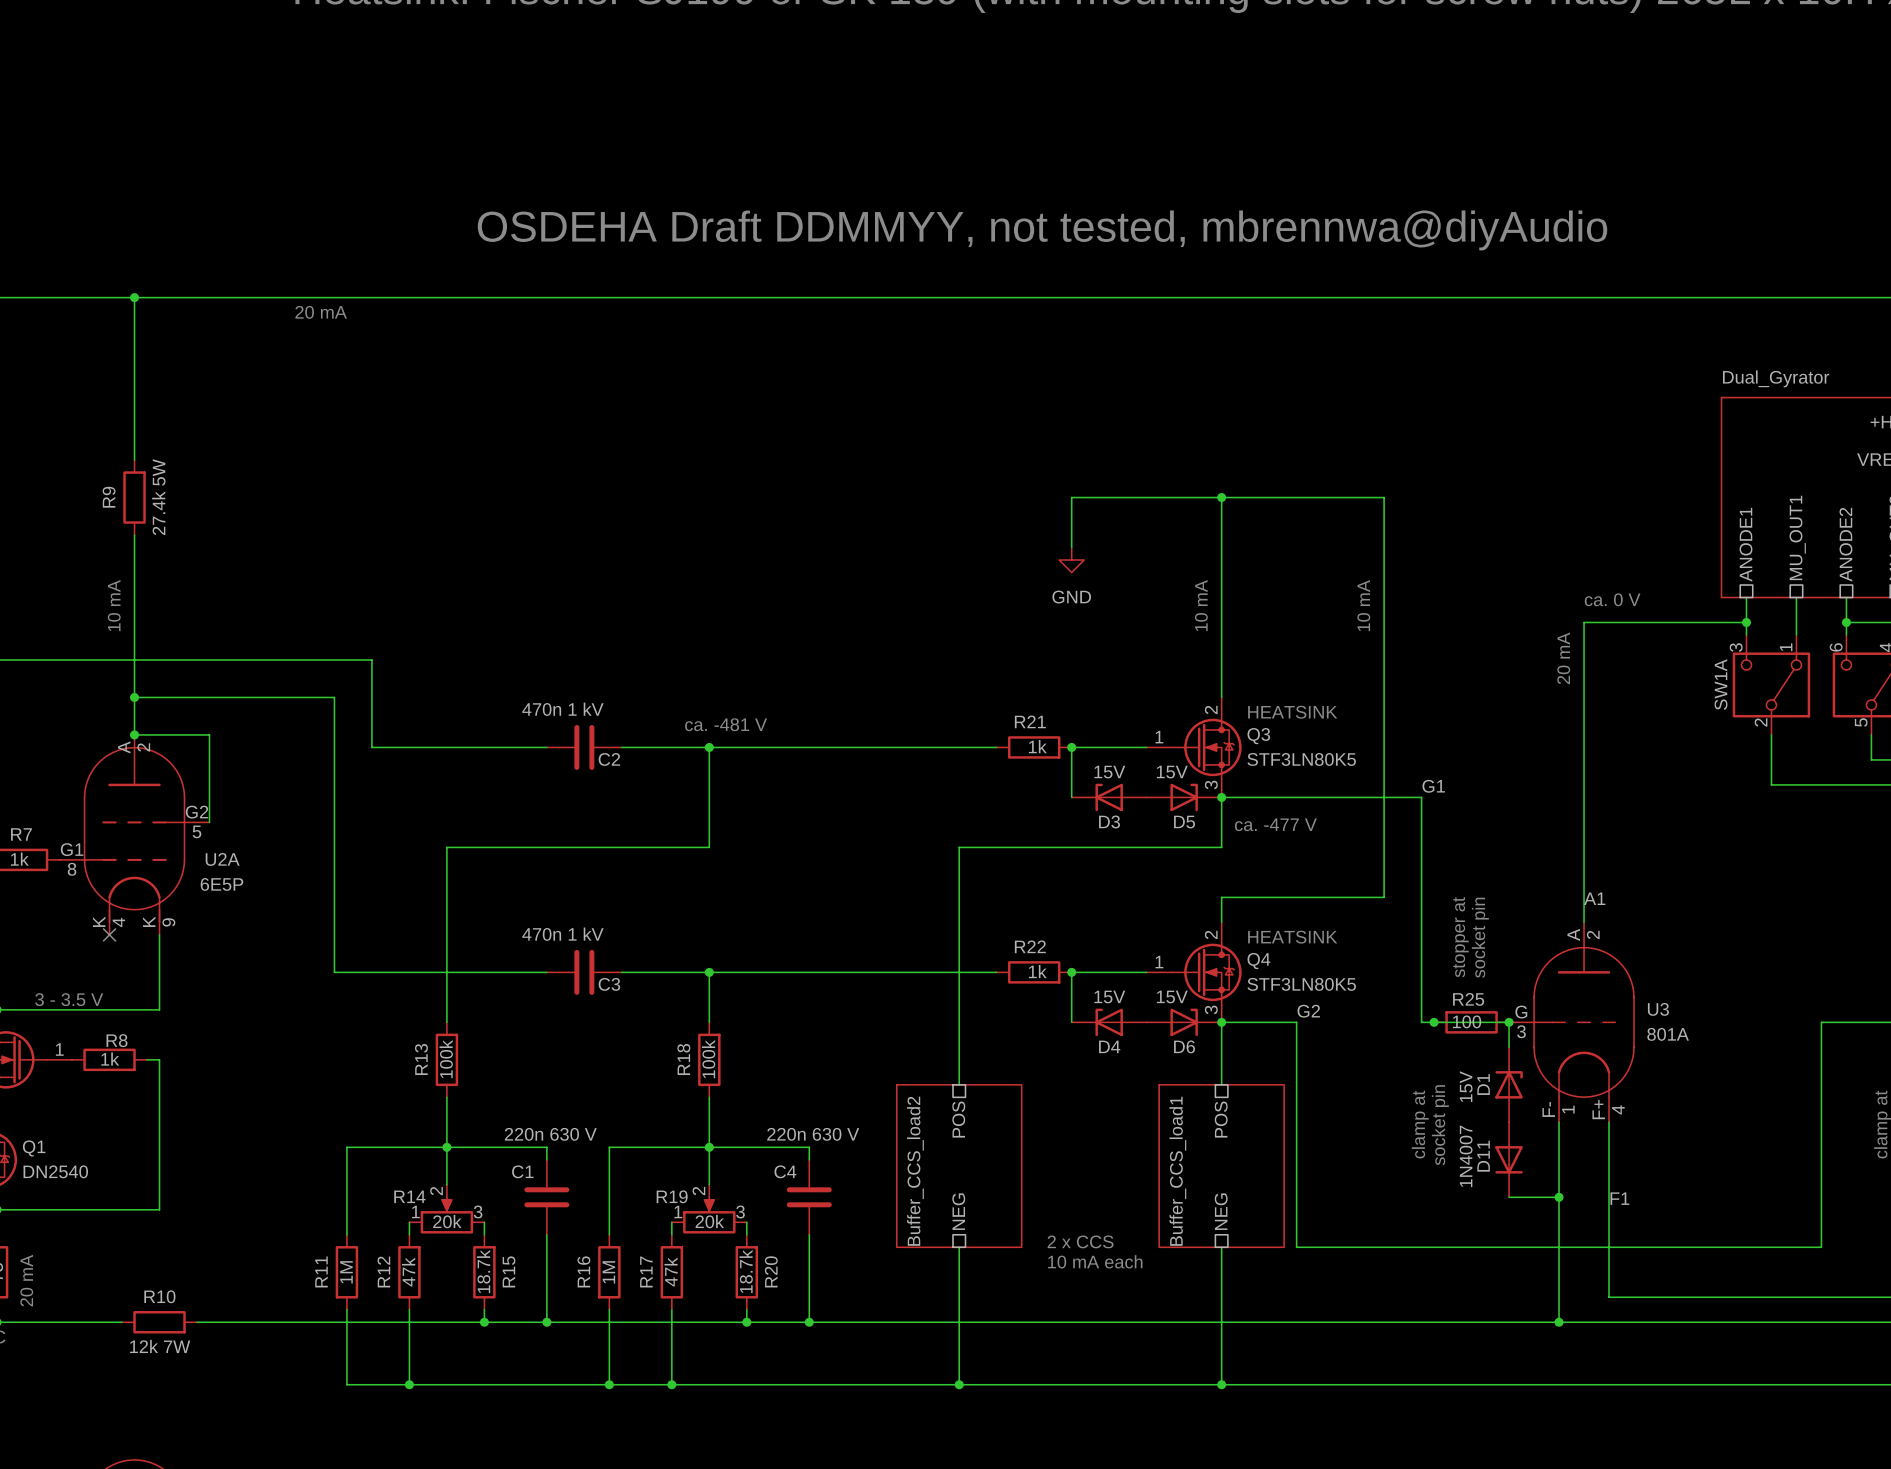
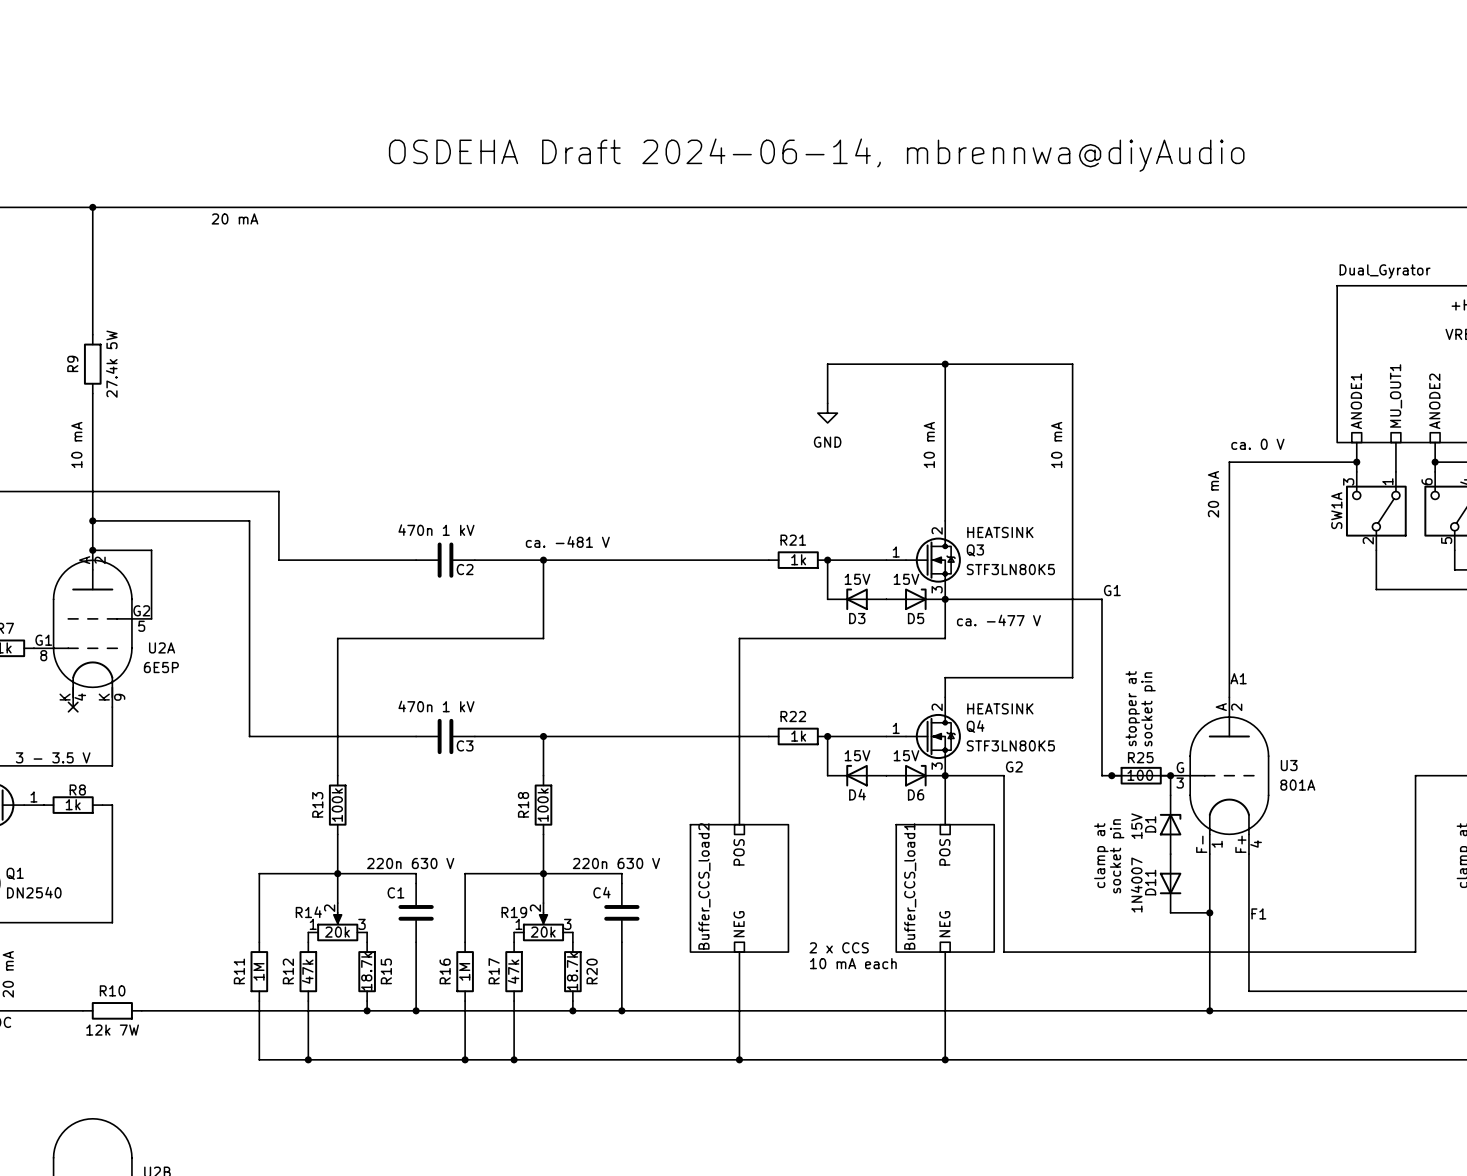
text: OSDEHA Draft DDMMYY, not tested, mbrennwa@diyAudio (1042, 230) -> OSDEHA Draft 2024-06-14, mbrennwa@diyAudio (816, 155)

